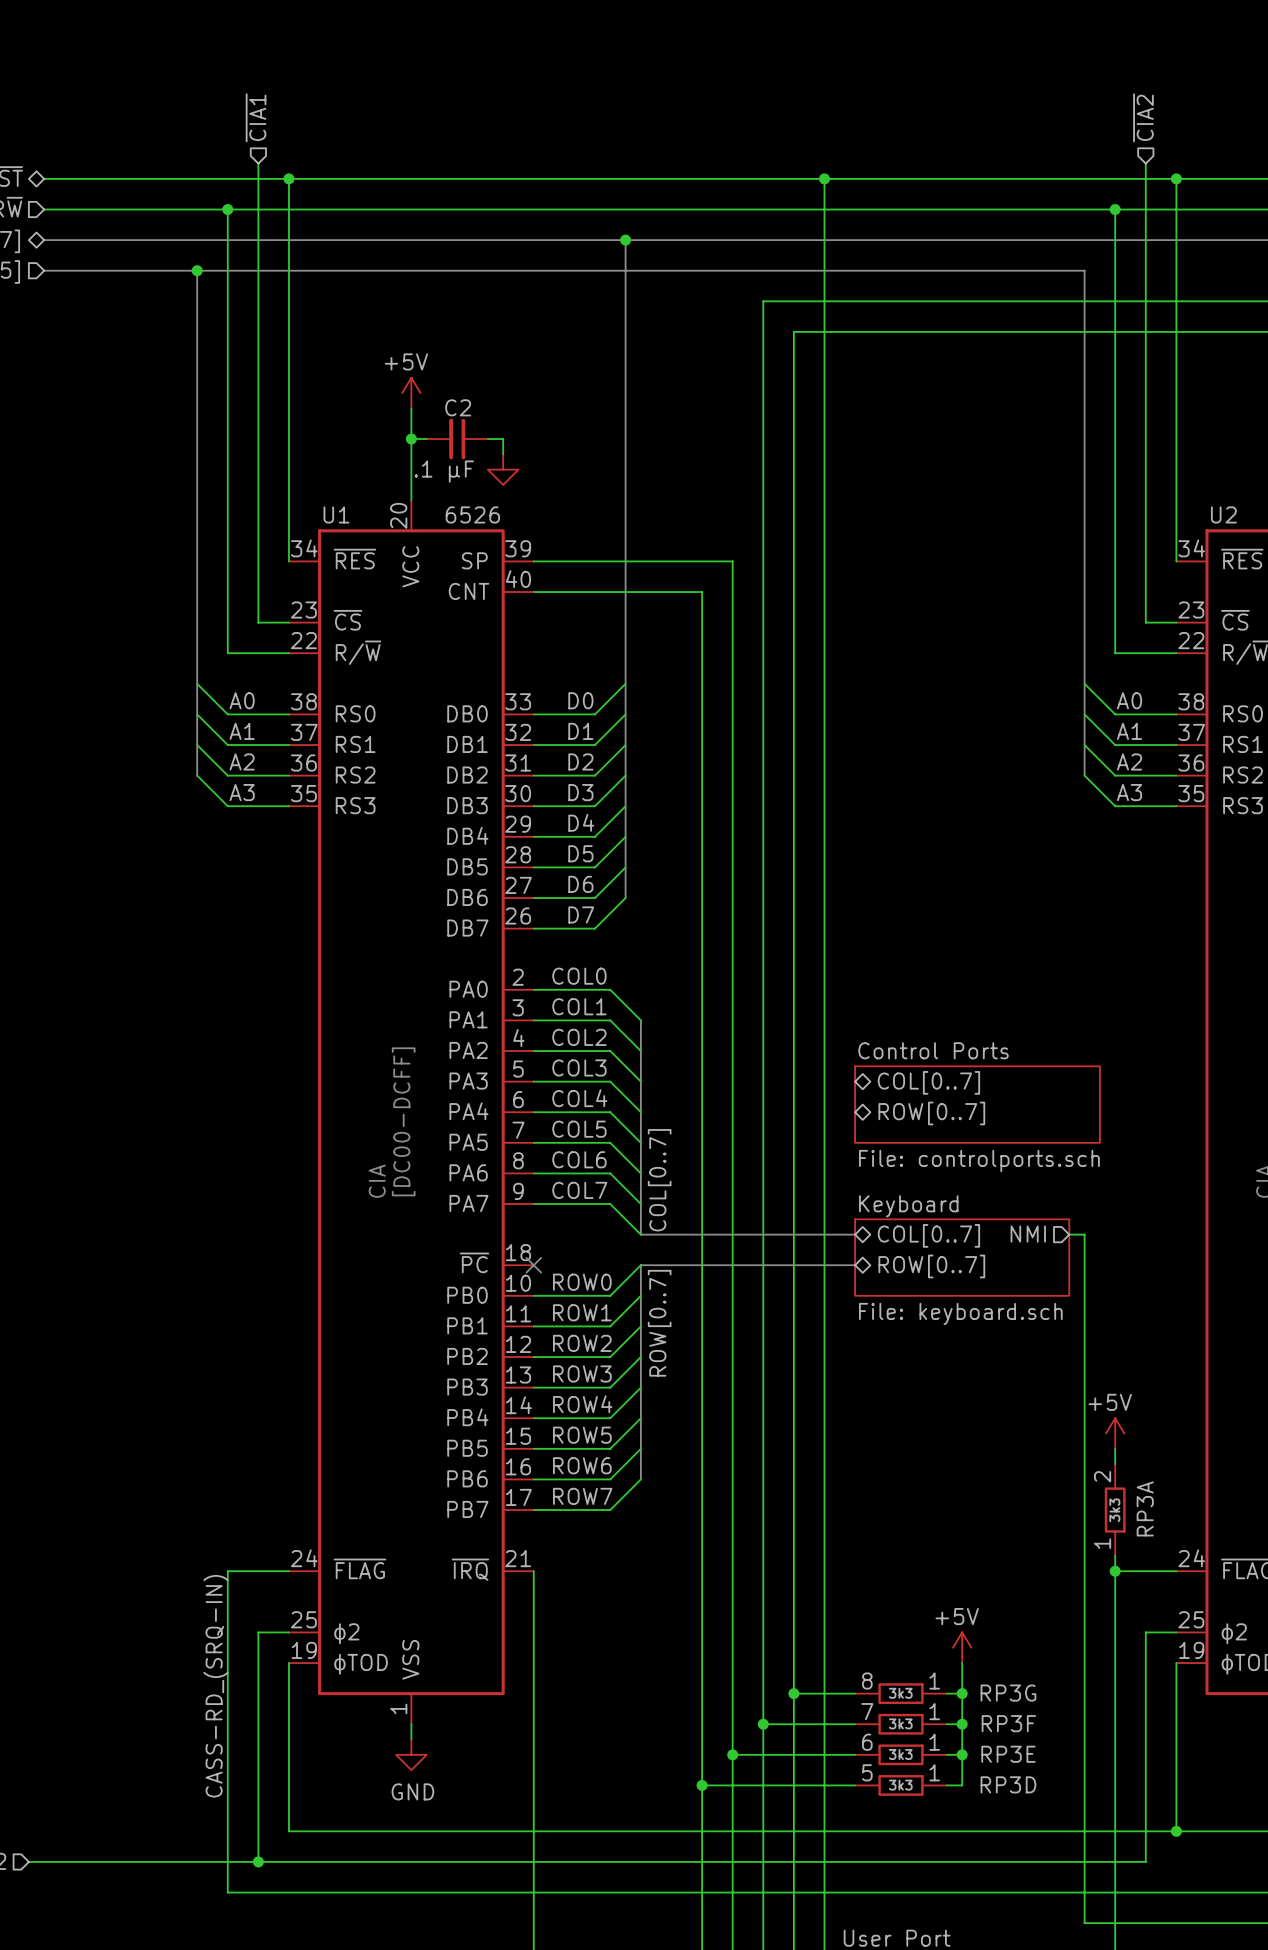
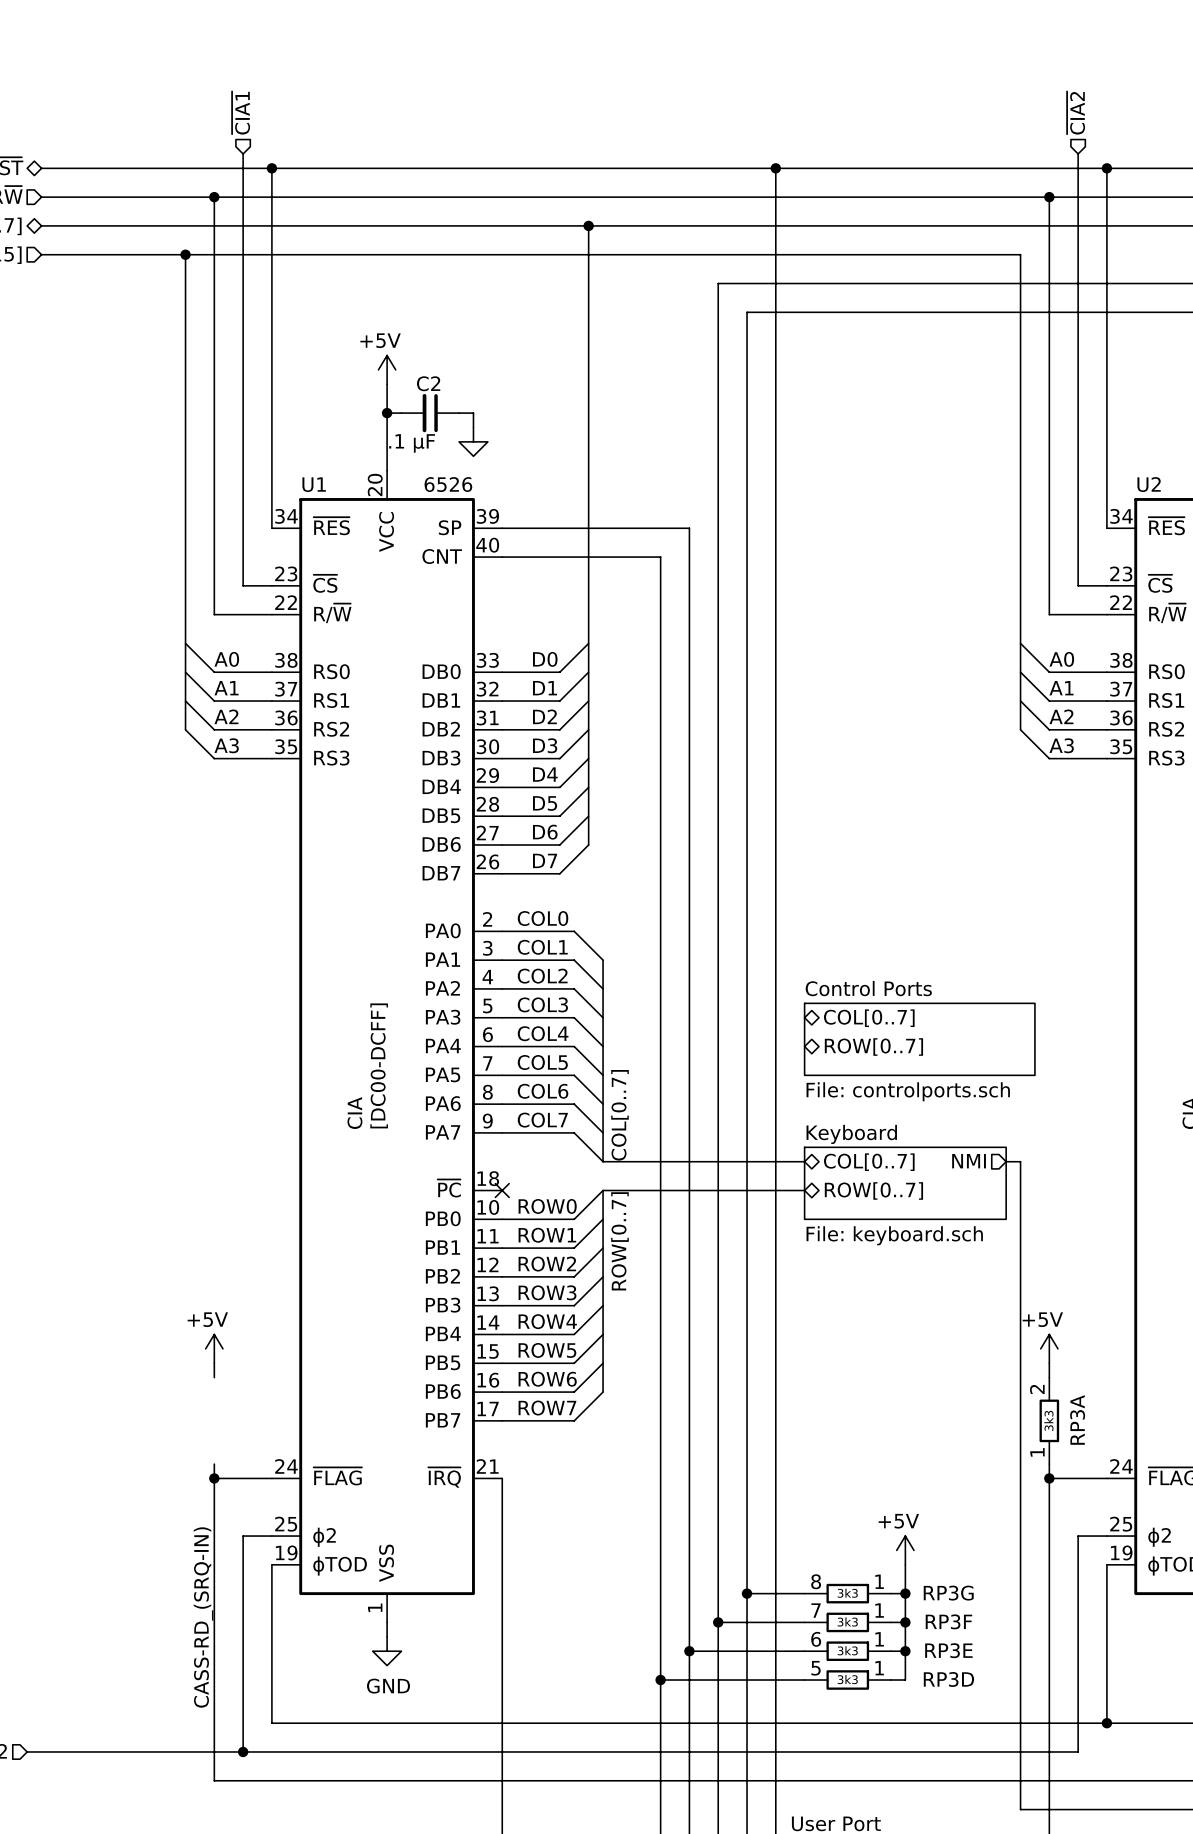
power symbol: none -> +5V (214, 1348)
wire: none -> (214, 1363) (214, 1377)
wire: none -> (214, 1464) (214, 1478)
junction: none -> (214, 1478)
label position: CASS-RD_(SRQ-IN) (215, 1686) -> CASS-RD_(SRQ-IN) (203, 1617)

